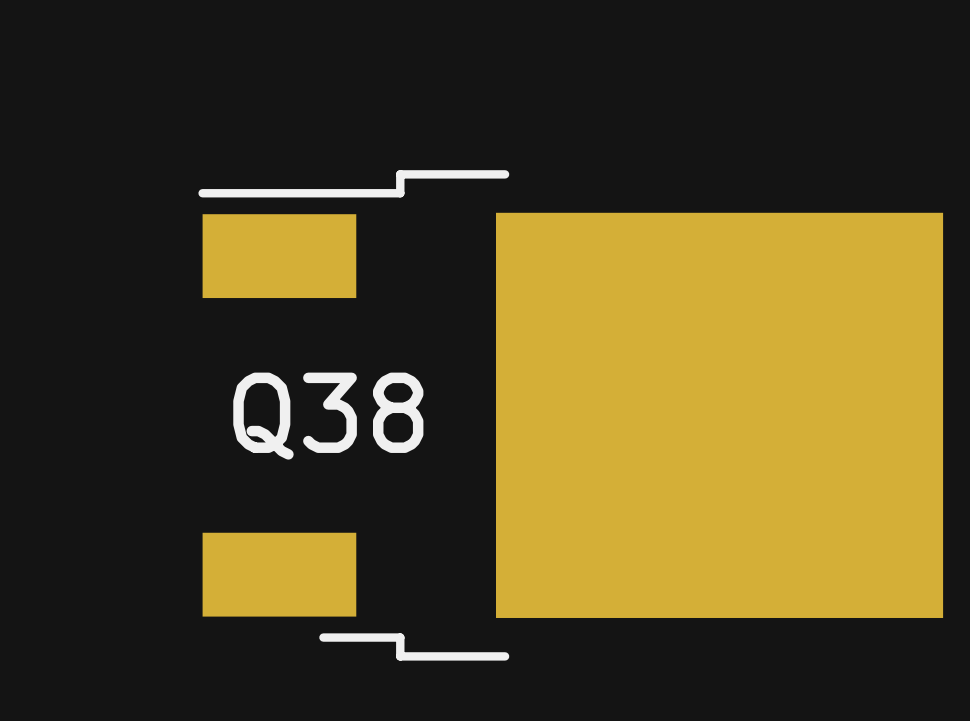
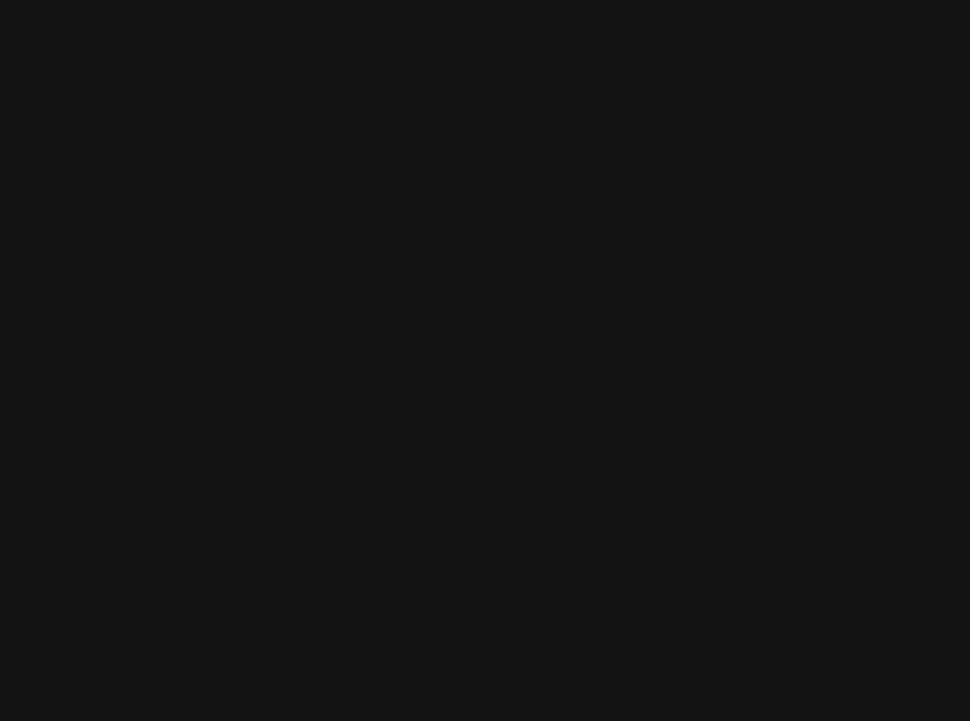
Q38: (570, 415) -> none

